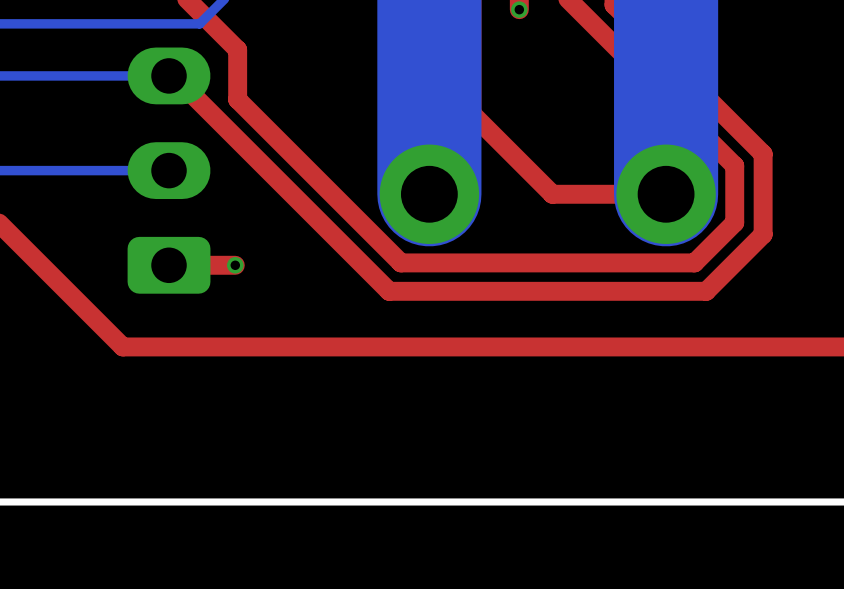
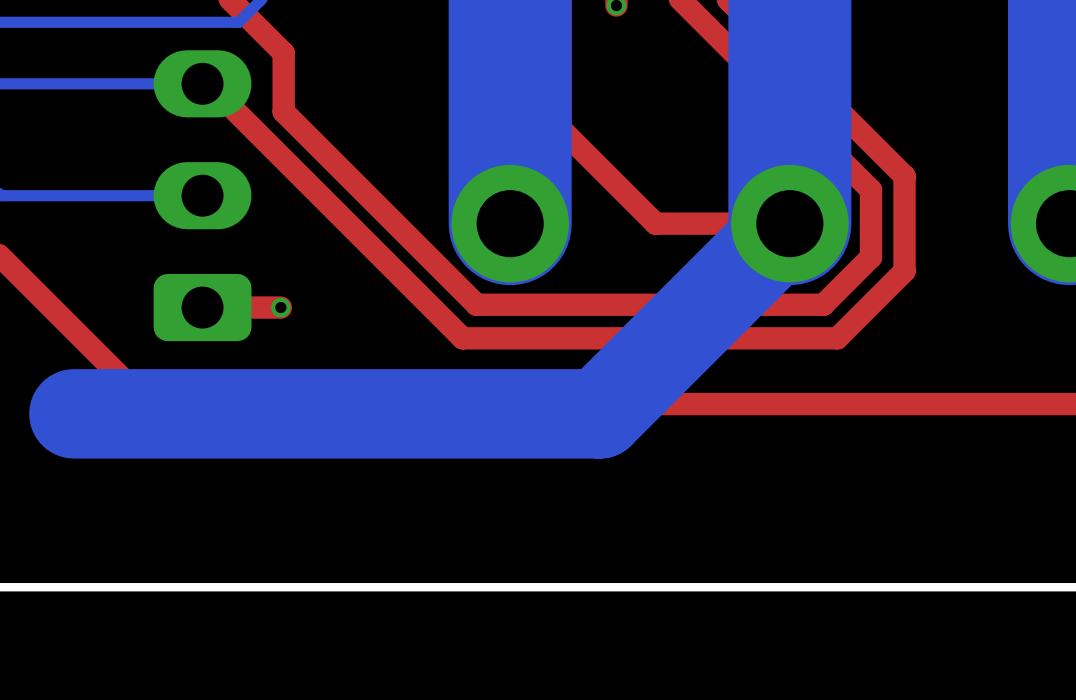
bottom track: none -> (789, 223) (599, 413) (73, 413)

